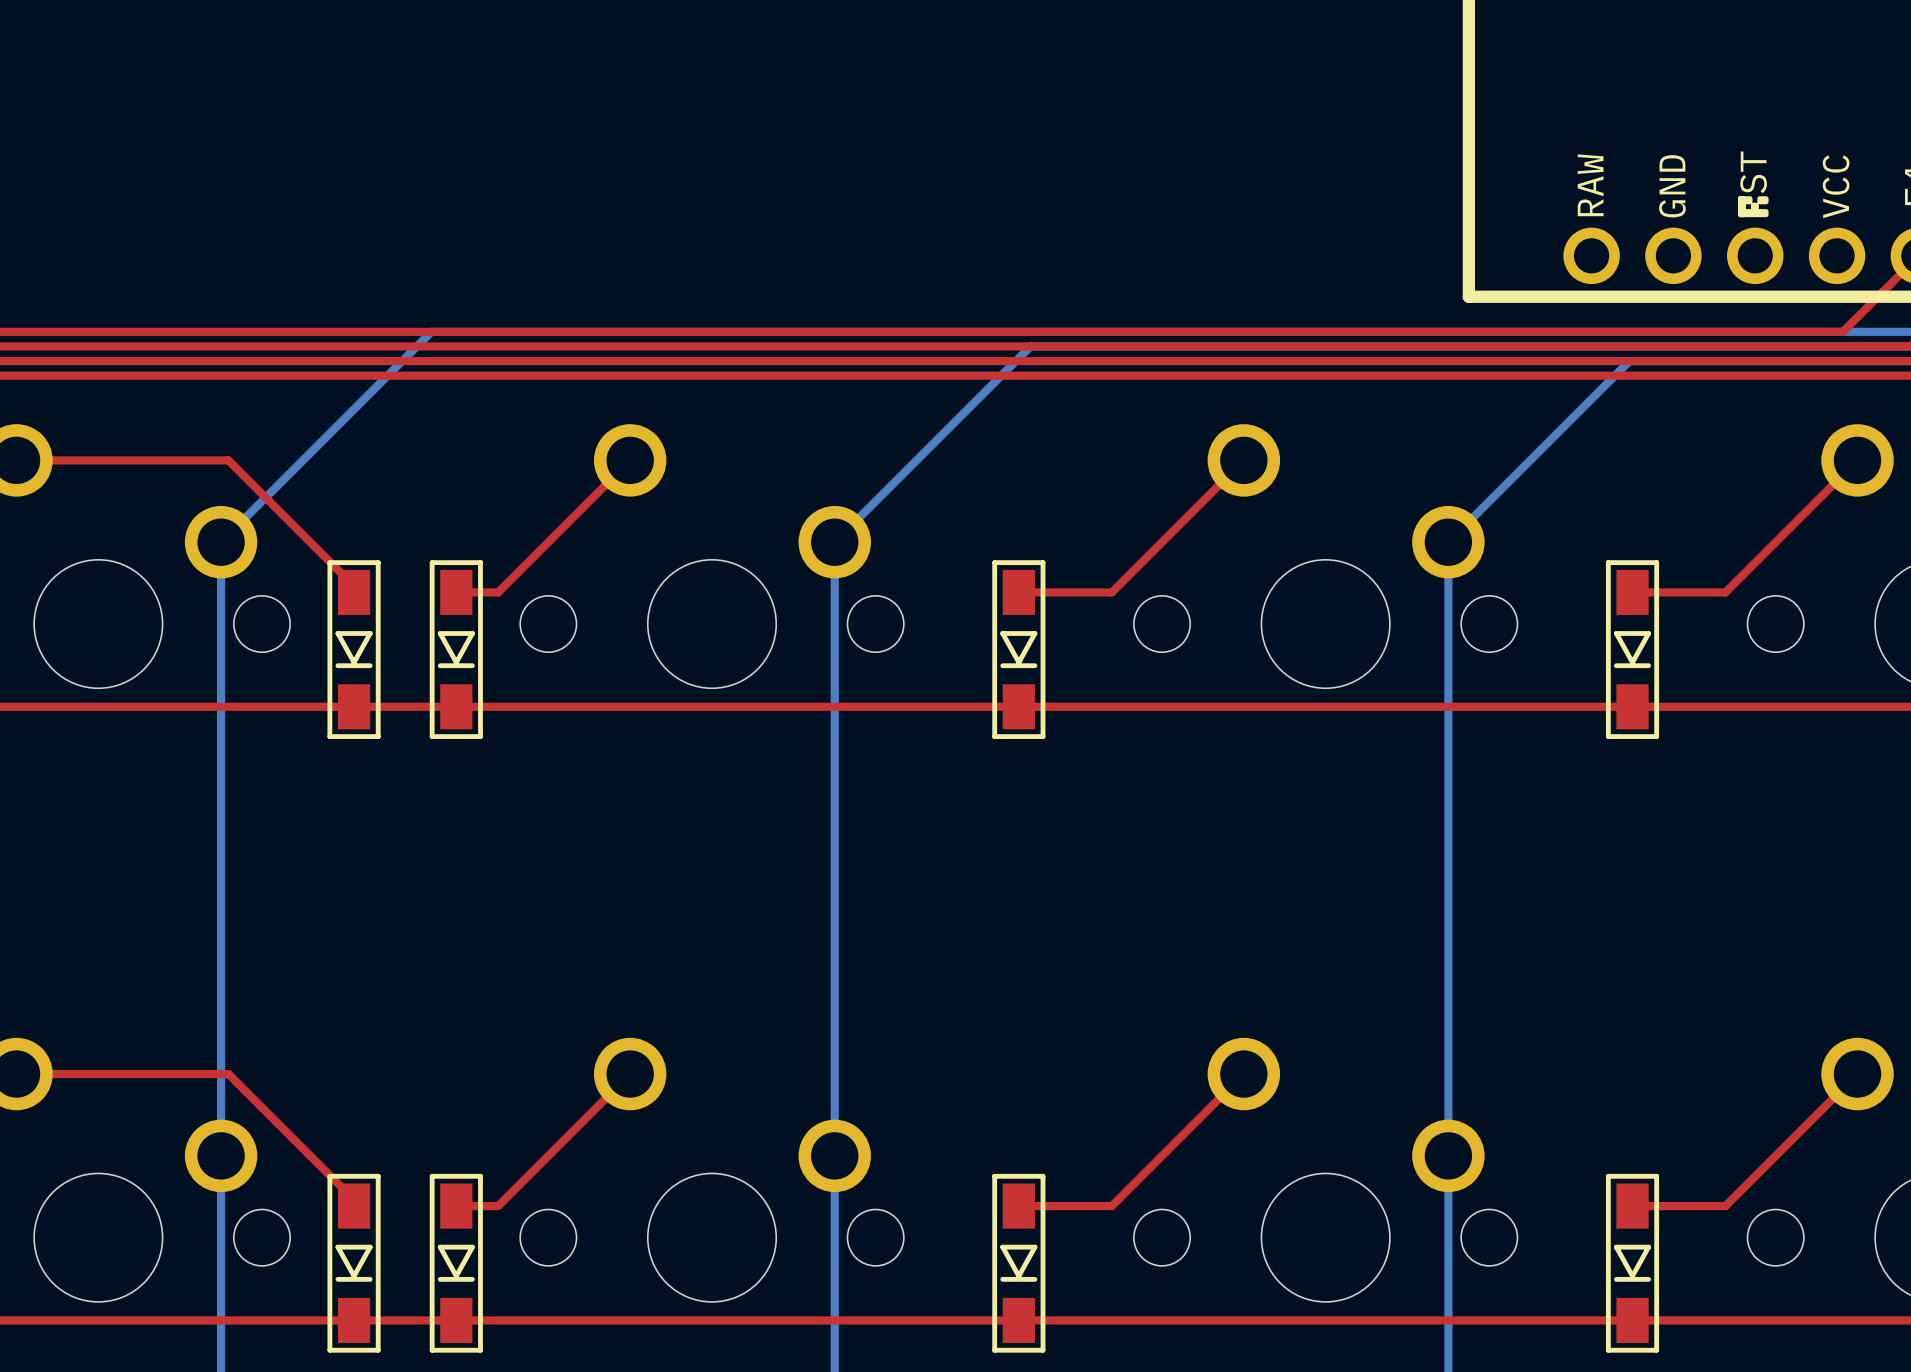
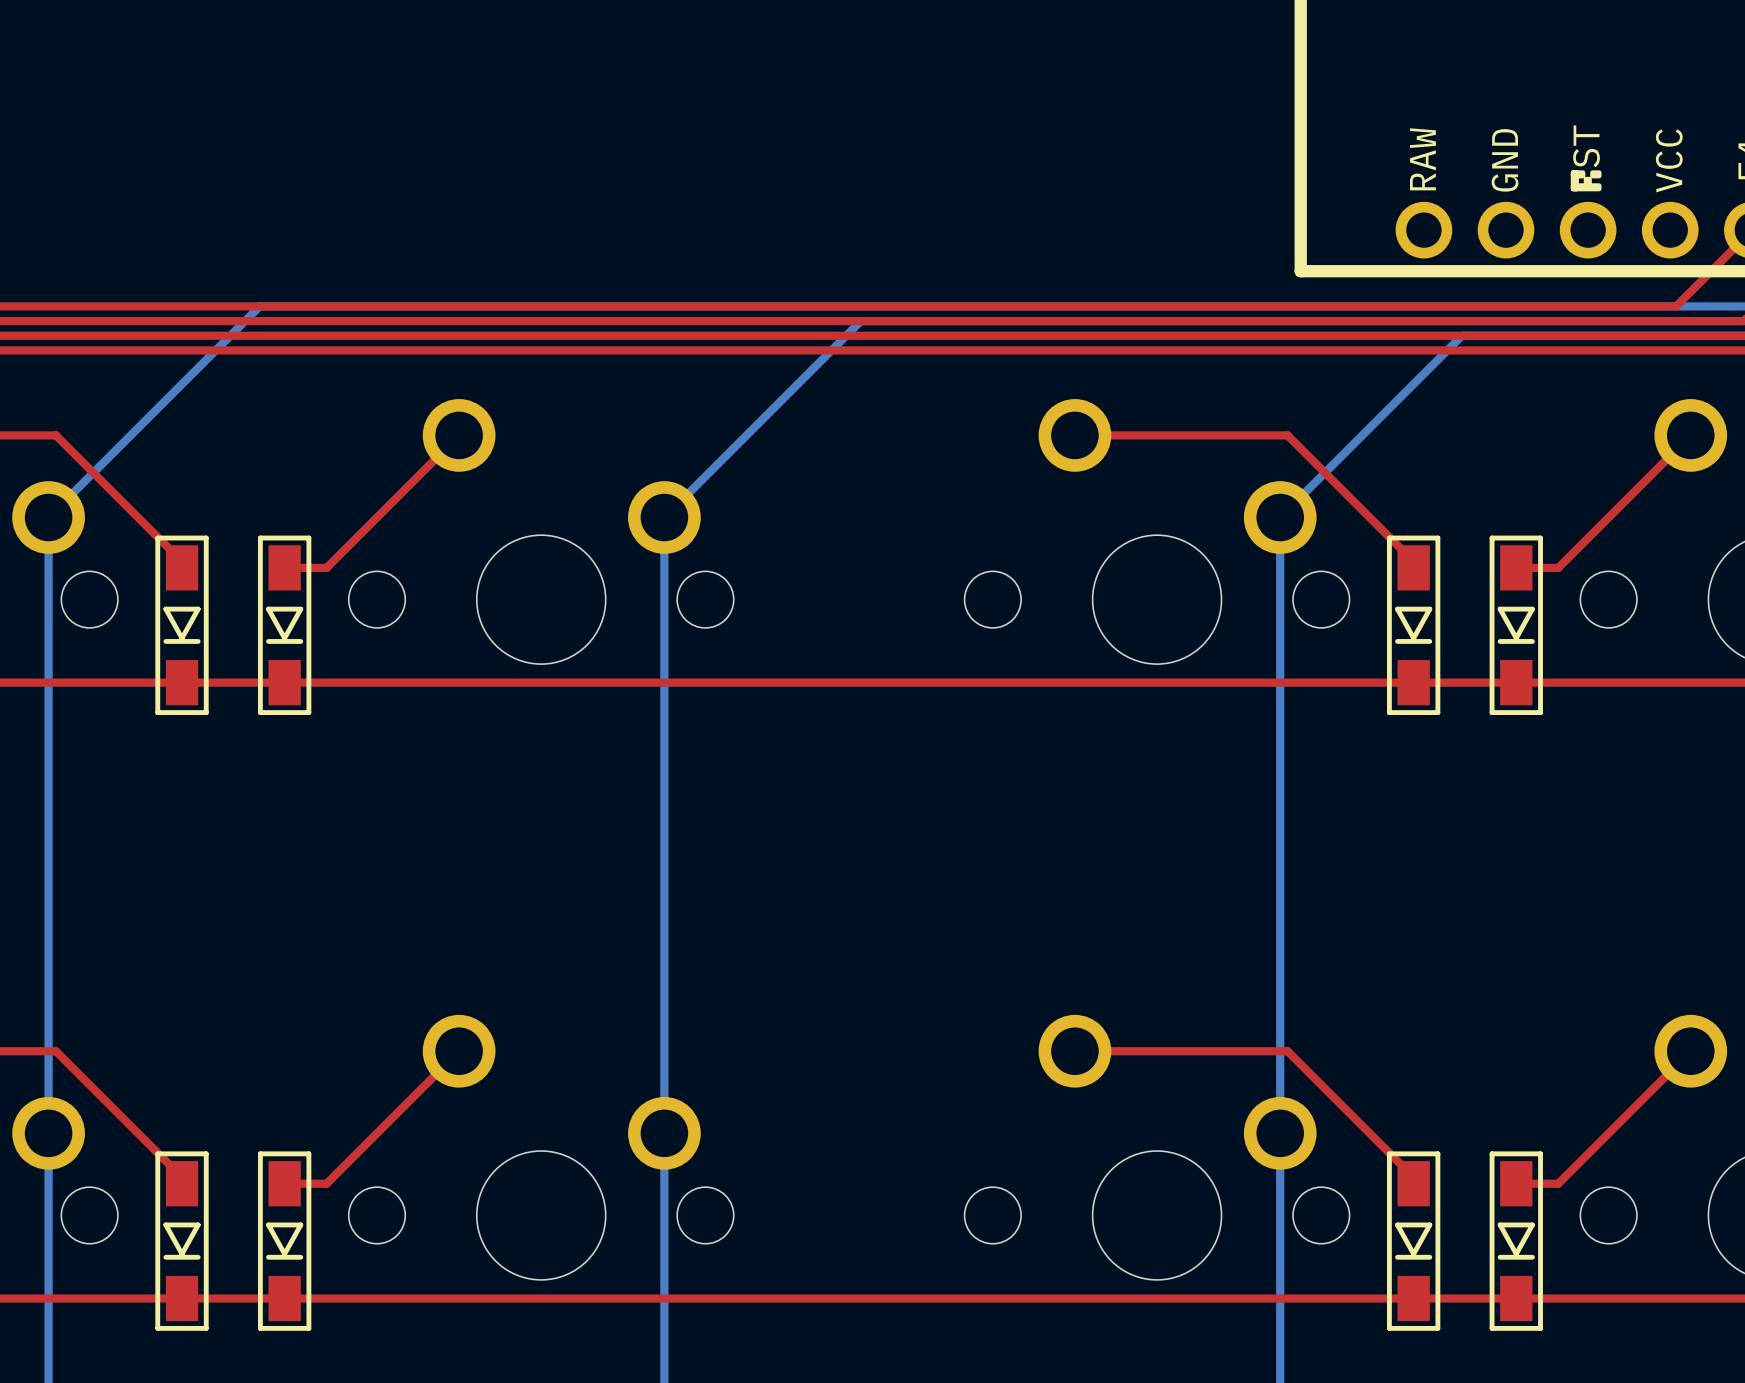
top track: (1243, 460) (1111, 592) (1018, 592) -> (1074, 435) (1287, 435) (1413, 561) (1413, 567)
top track: (1632, 592) (1683, 592) -> none
part: (1018, 649) -> none
part: none -> (1413, 625)
part: (1632, 649) -> none
part: none -> (1516, 625)
top track: (1243, 1074) (1111, 1206) (1018, 1206) -> (1074, 1051) (1287, 1051) (1413, 1177) (1413, 1183)
top track: (1632, 1206) (1683, 1206) -> none
part: (1018, 1263) -> none
part: none -> (1413, 1241)
part: (1632, 1263) -> none
part: none -> (1516, 1241)

